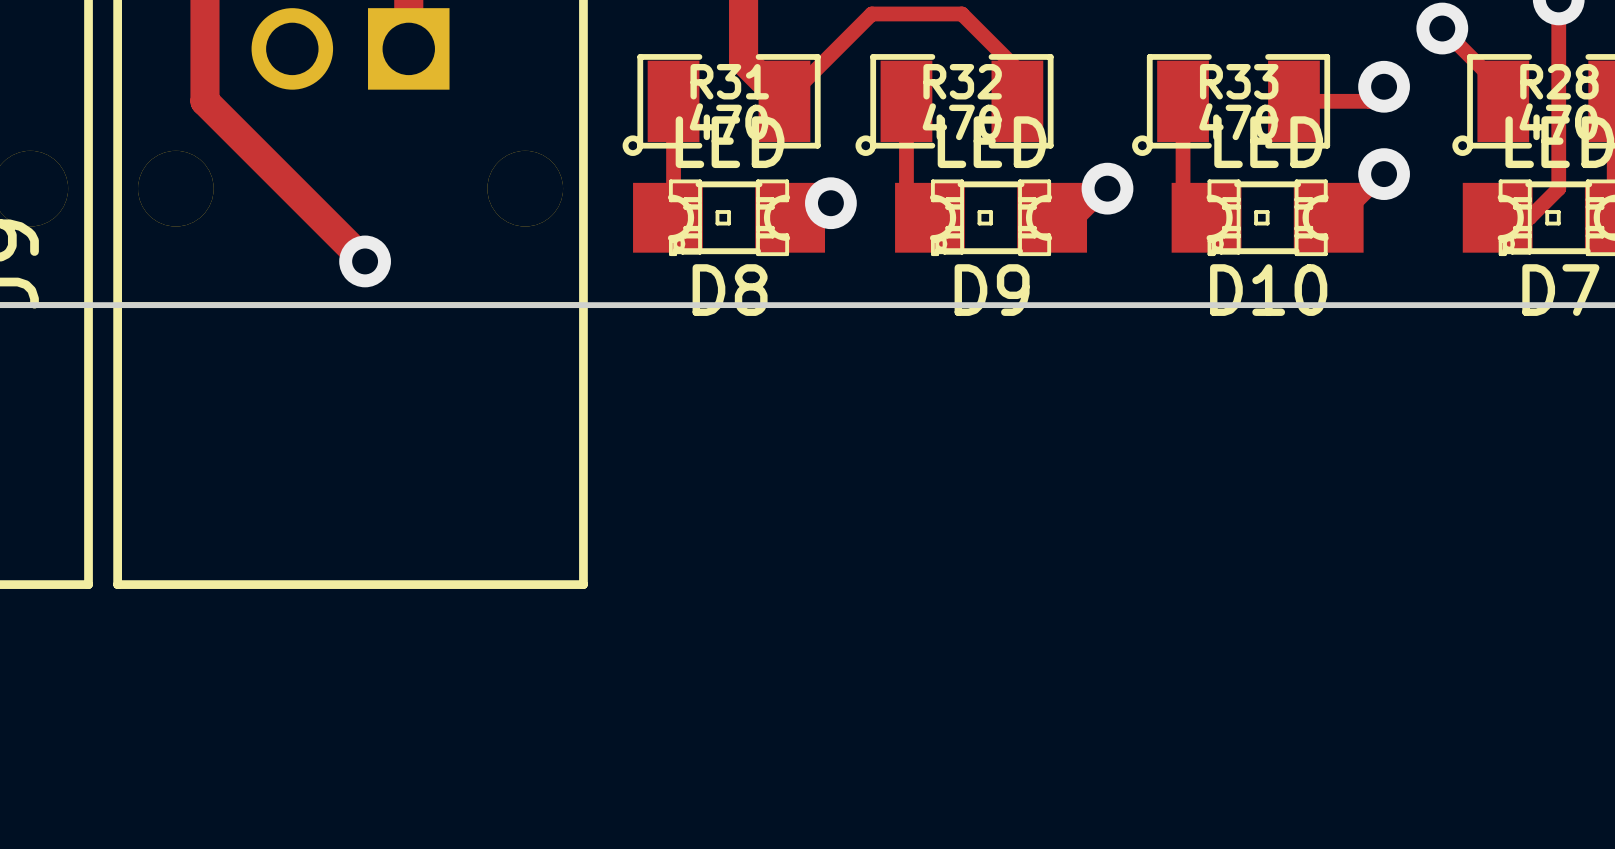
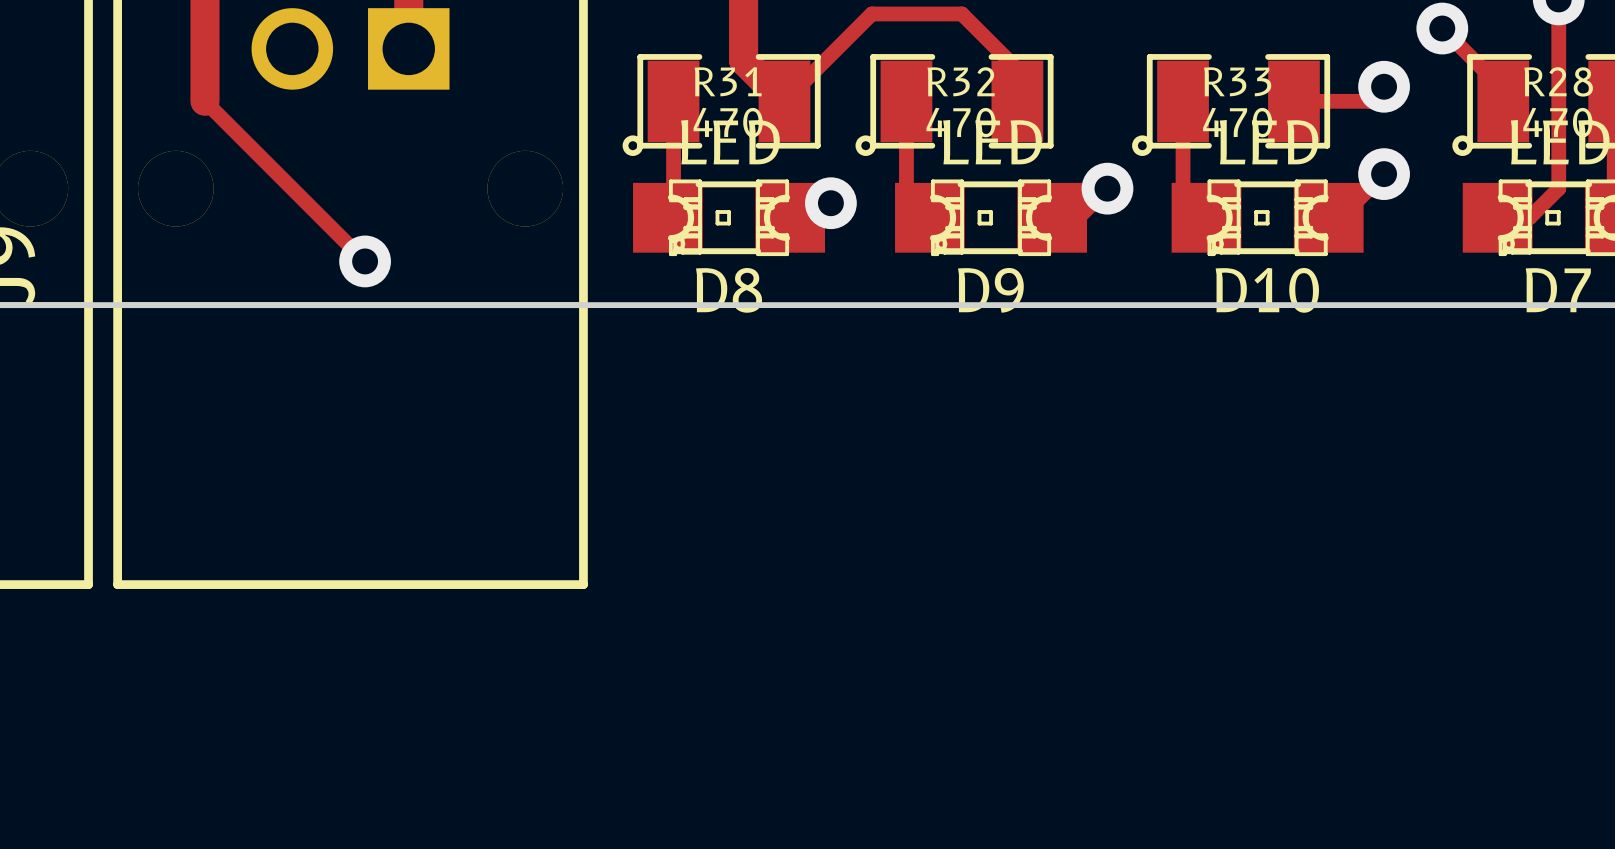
track width: thick (204, 101) (365, 261) -> thin (204, 101) (365, 261)

